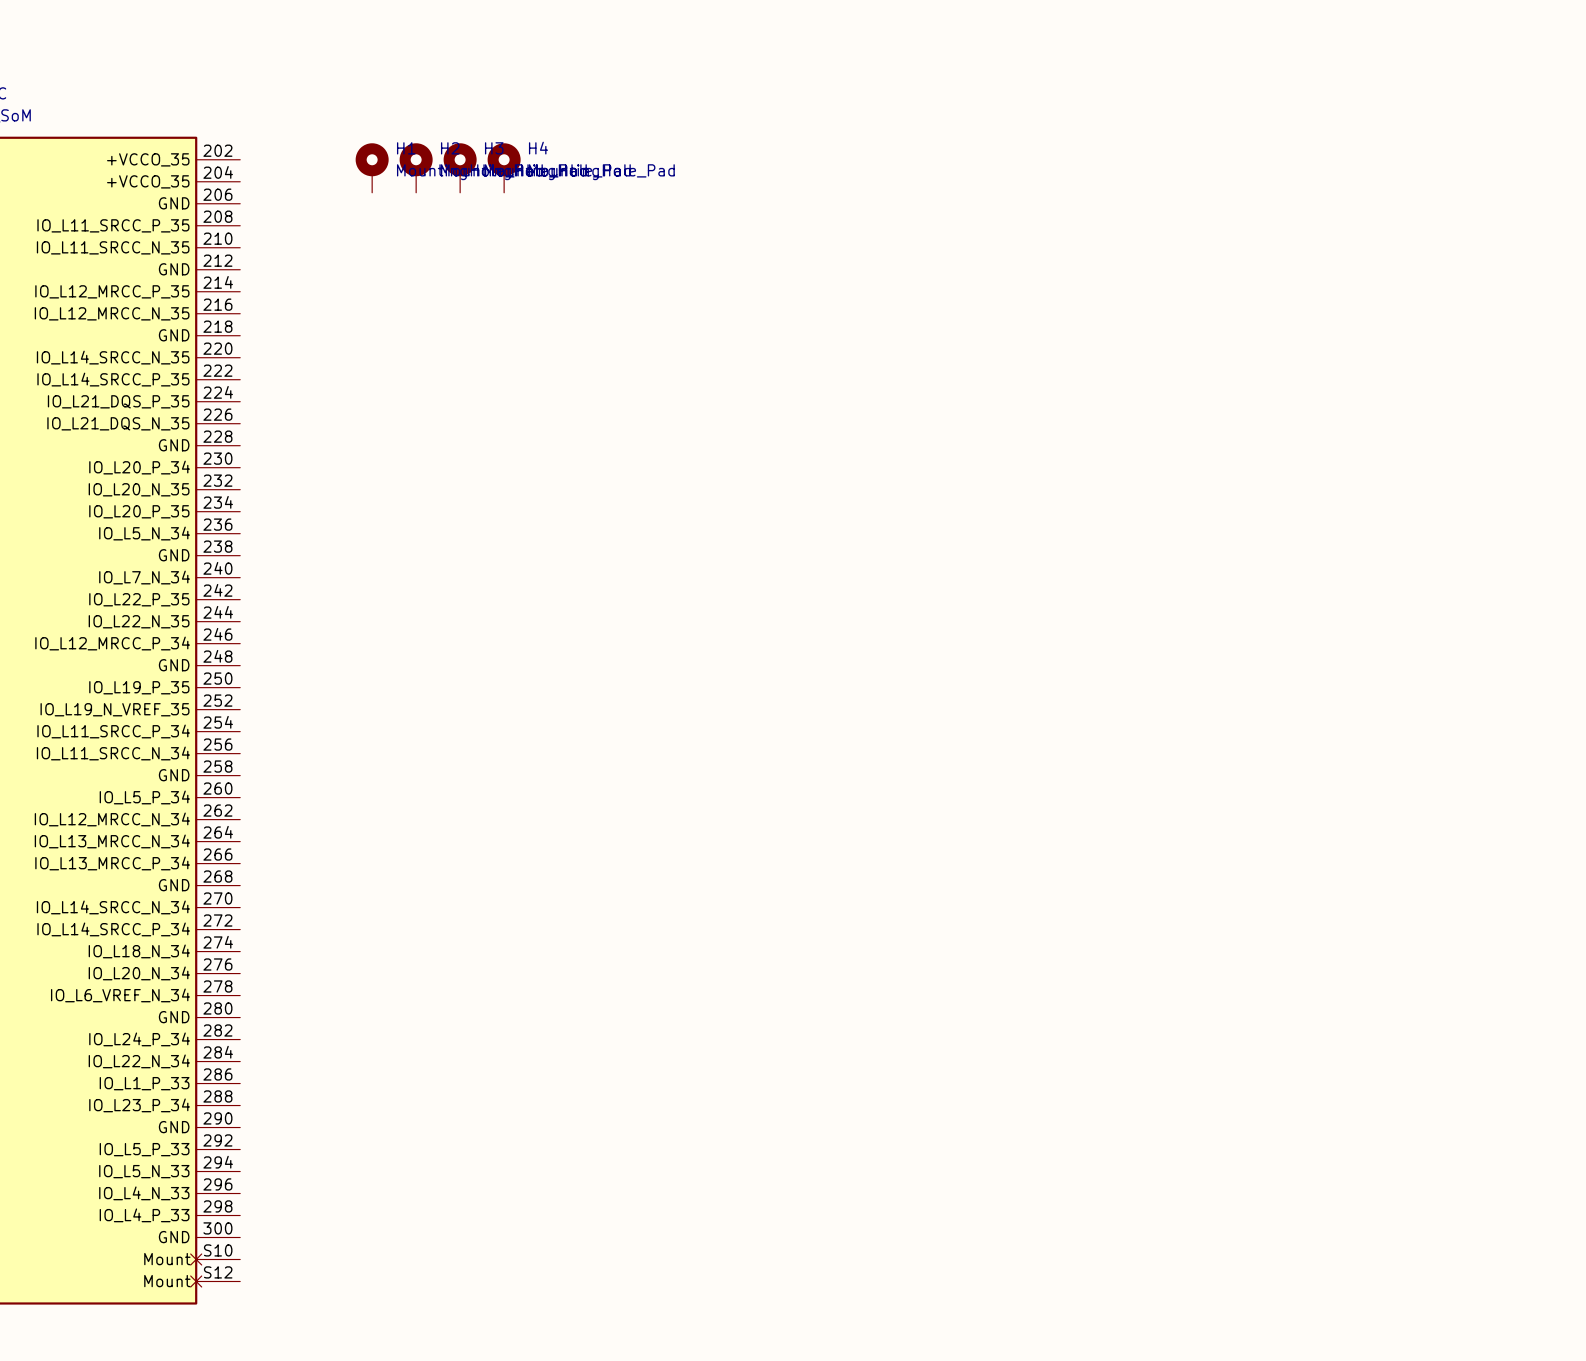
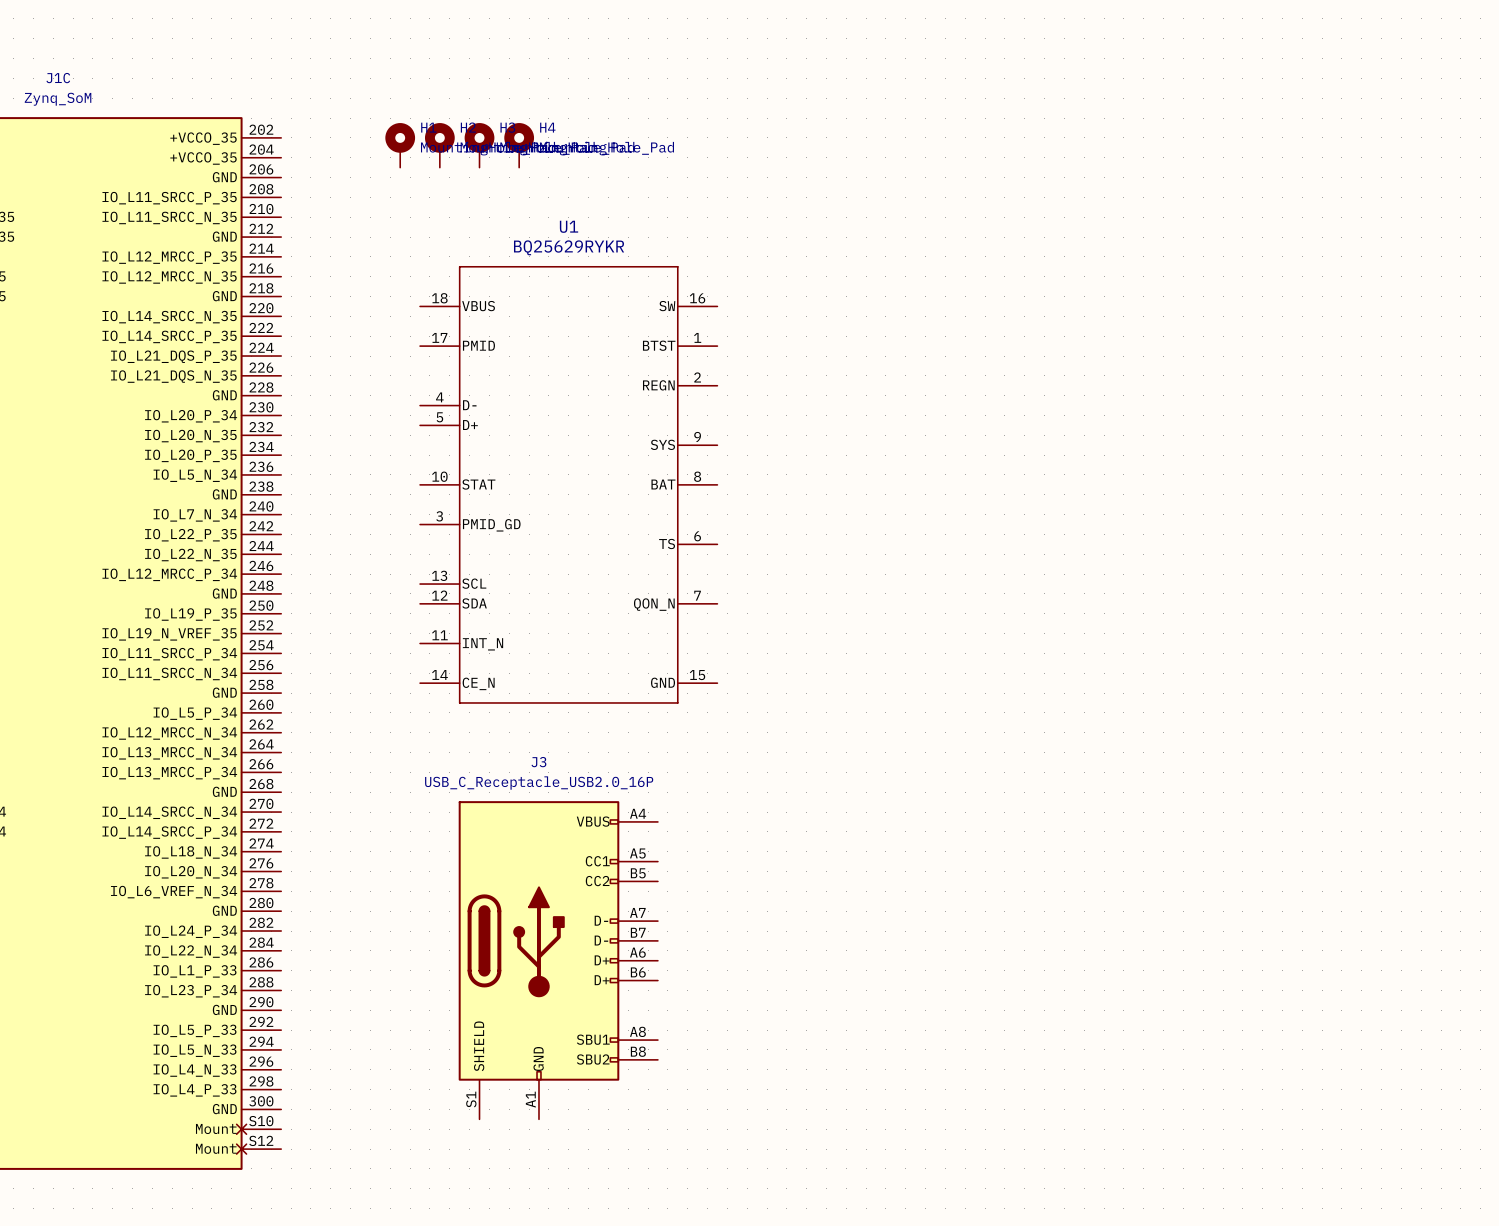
U1: none -> BQ25629RYKR (568, 484)
J3: none -> USB_C_Receptacle_USB2.0_16P (558, 960)

